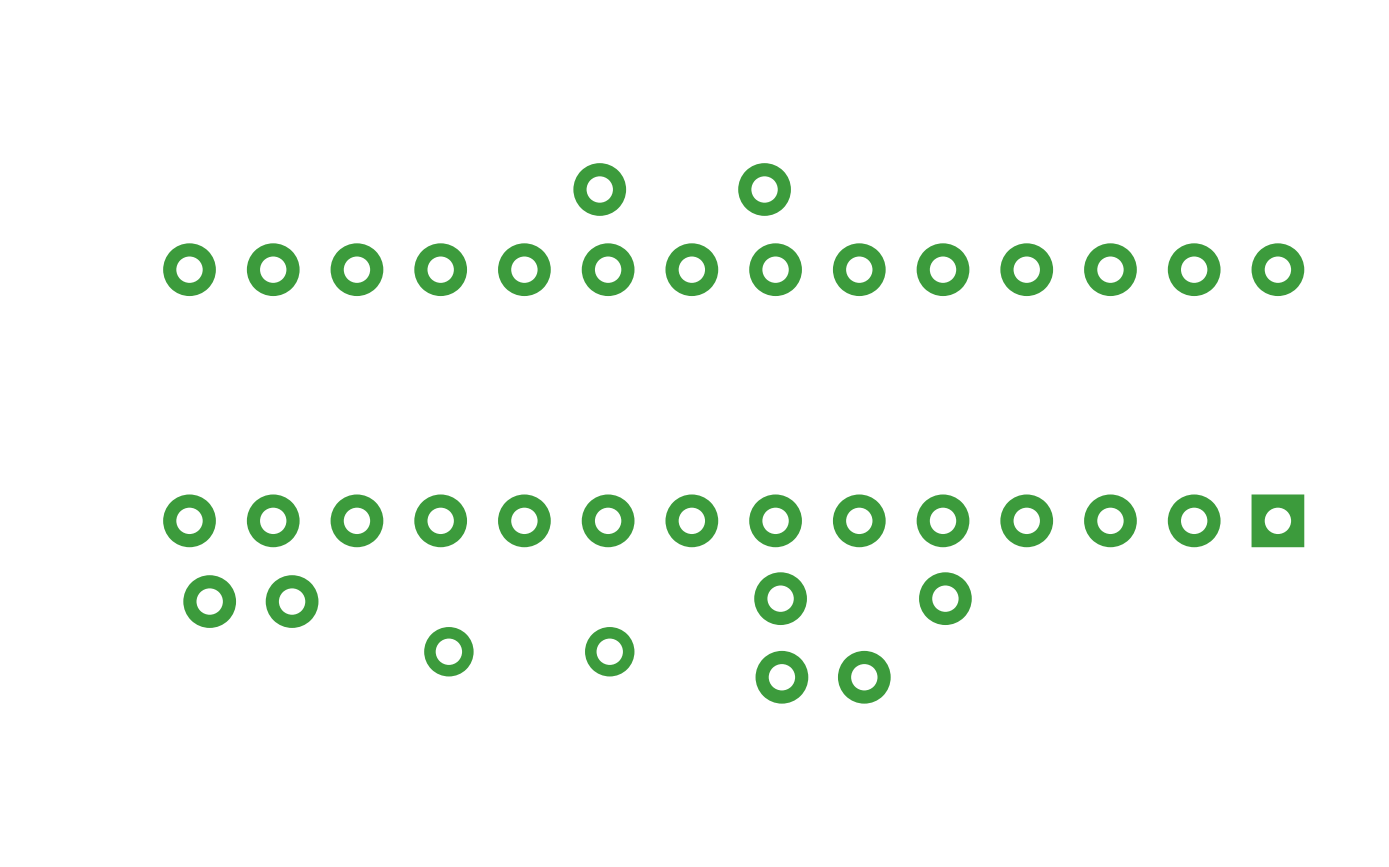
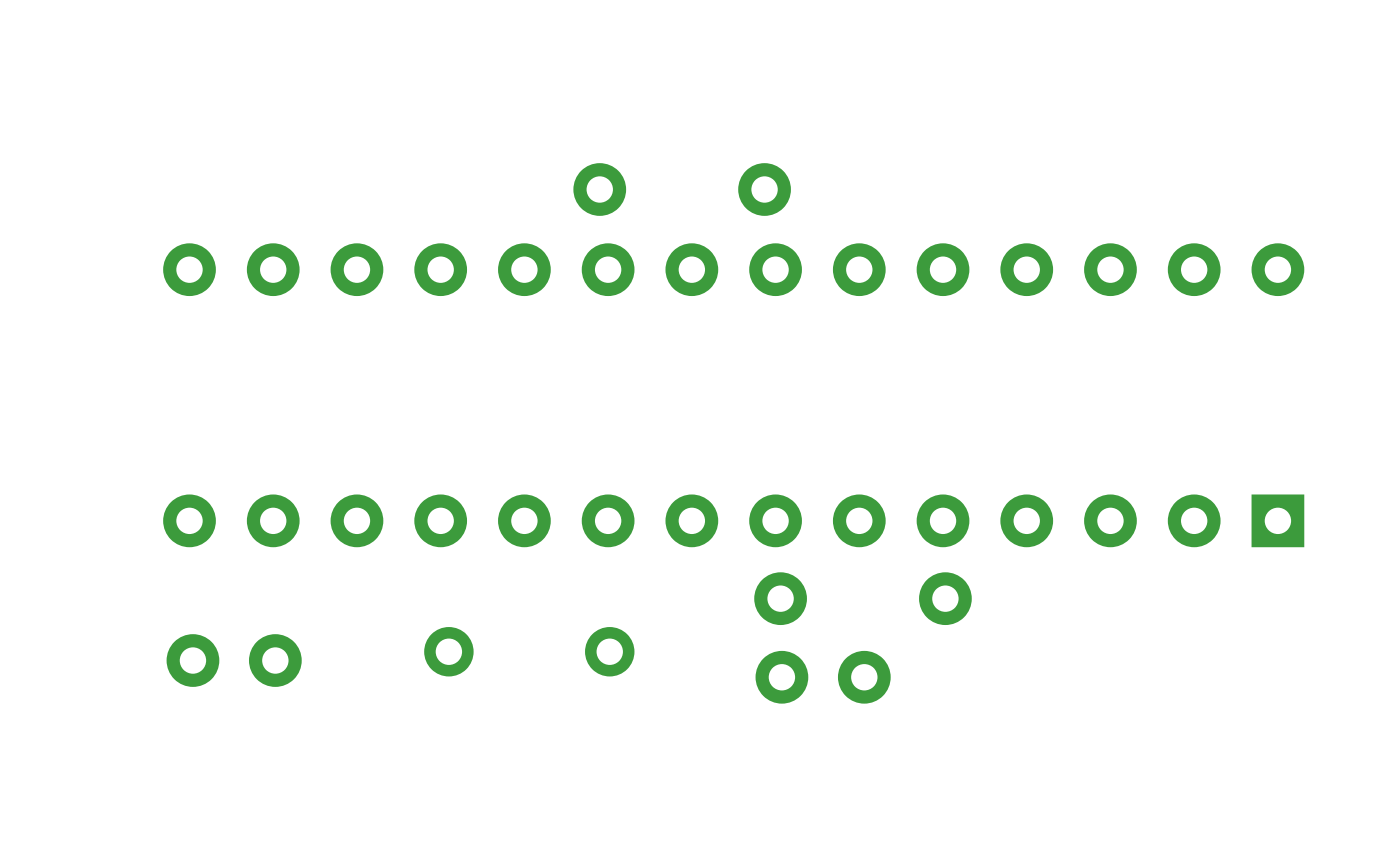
part position: (250, 601) -> (234, 660)

